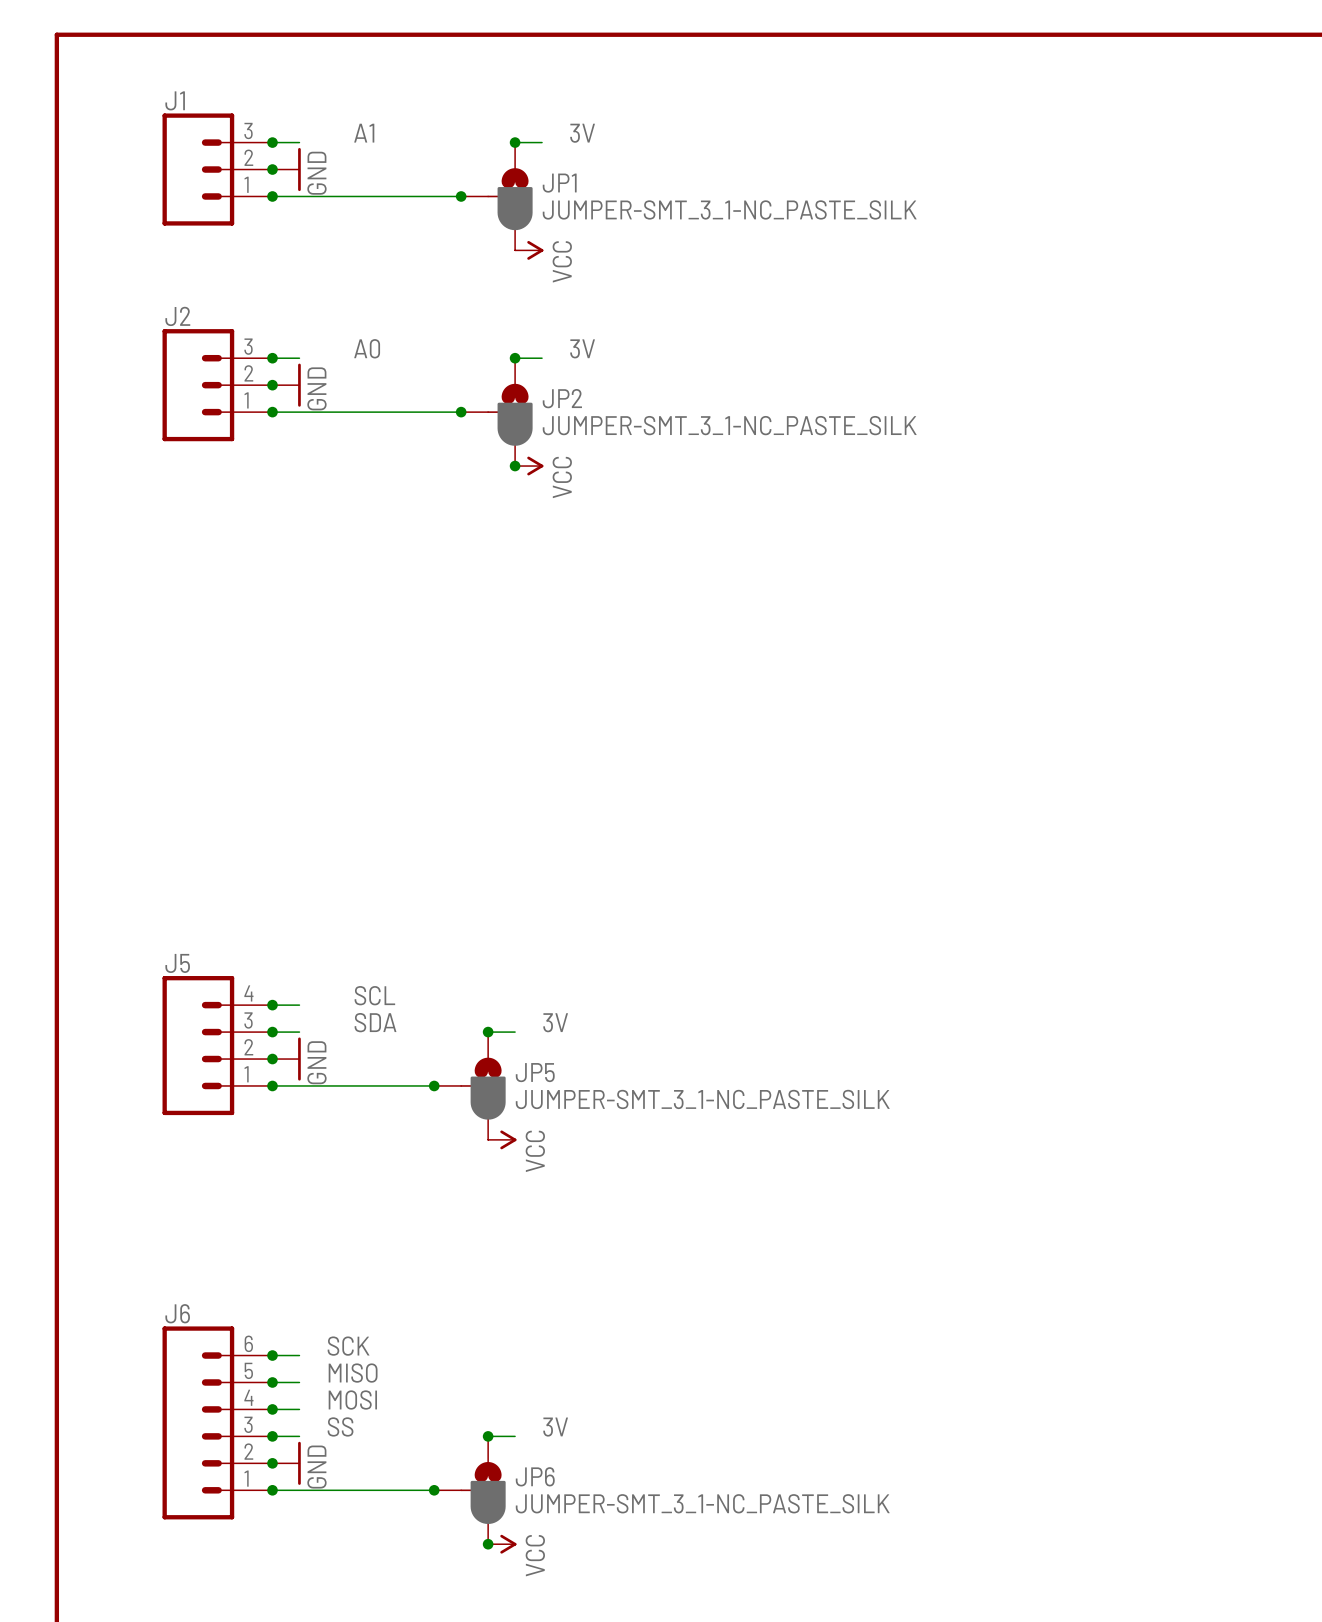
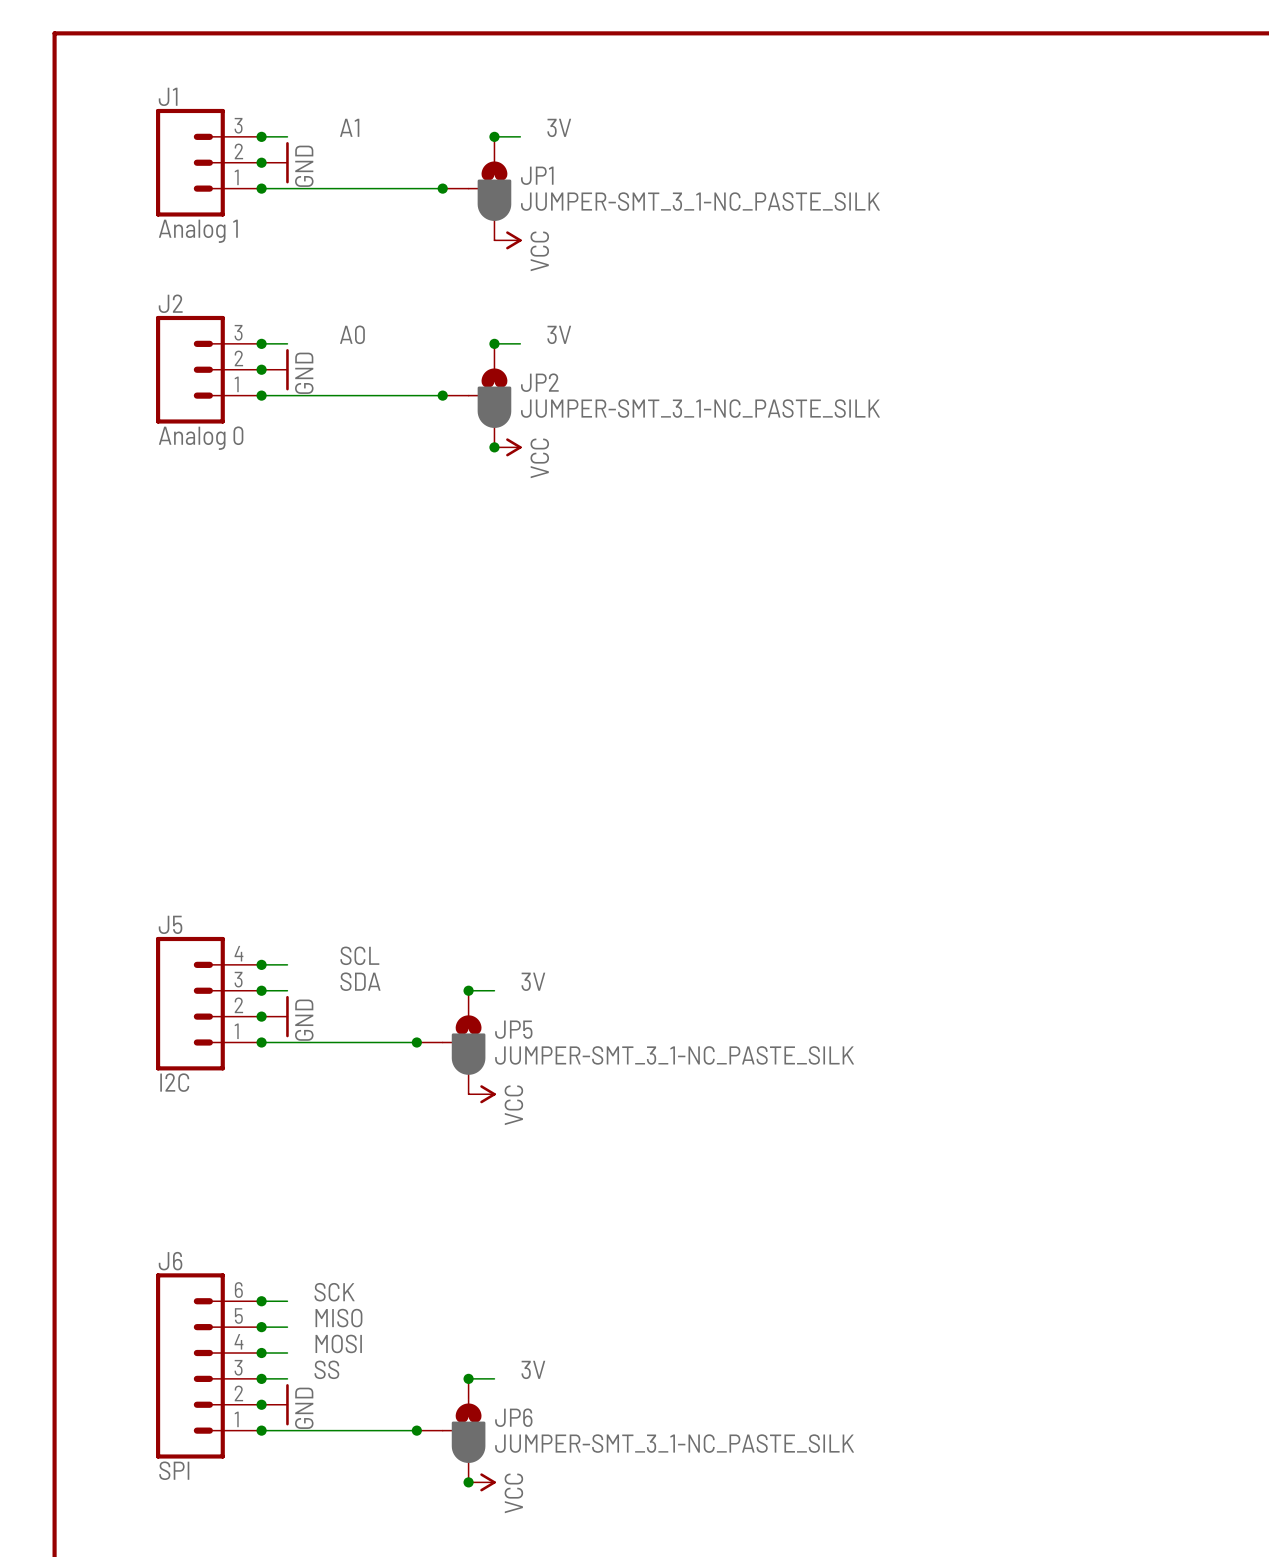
J1 value: none -> Analog 1 (198, 231)
J2 value: none -> Analog 0 (201, 438)
J5 value: none -> I2C (174, 1082)
J6 value: none -> SPI (174, 1470)

